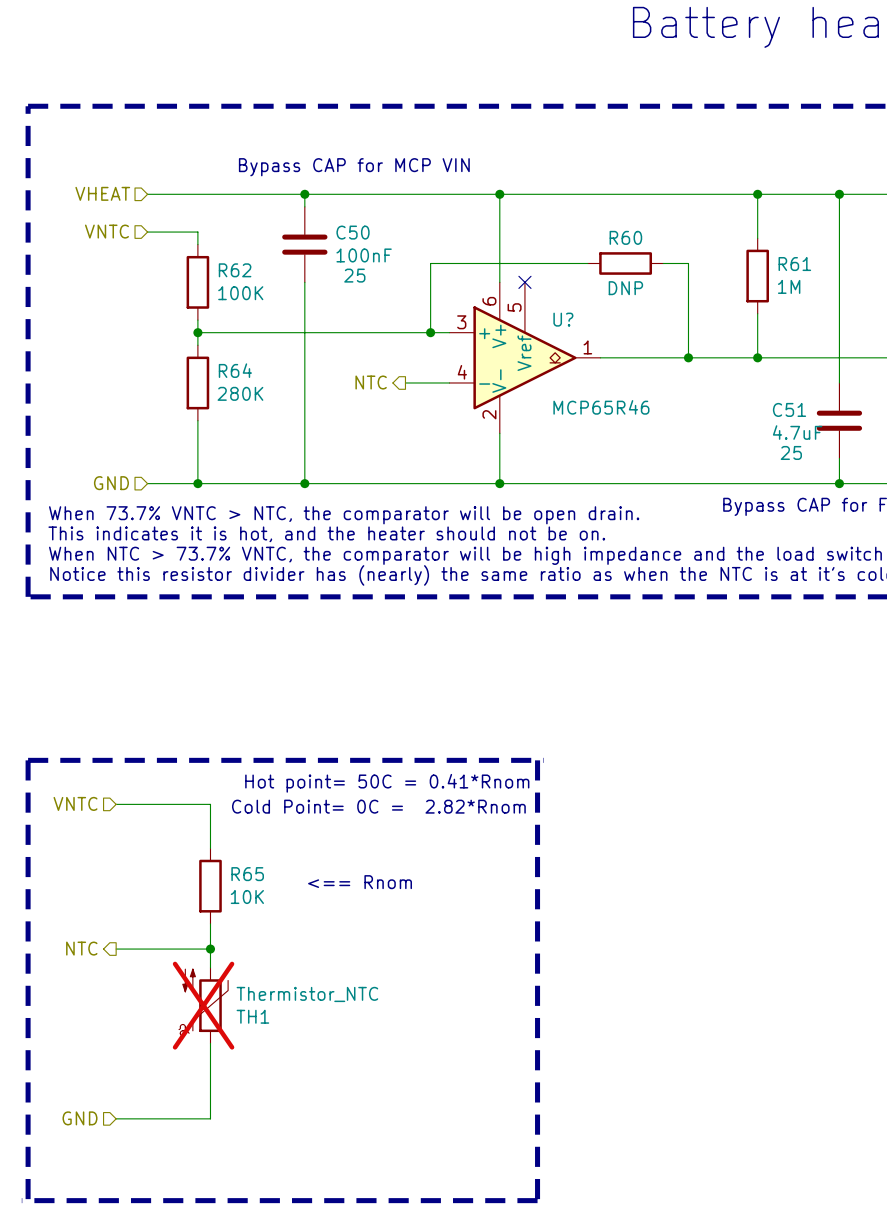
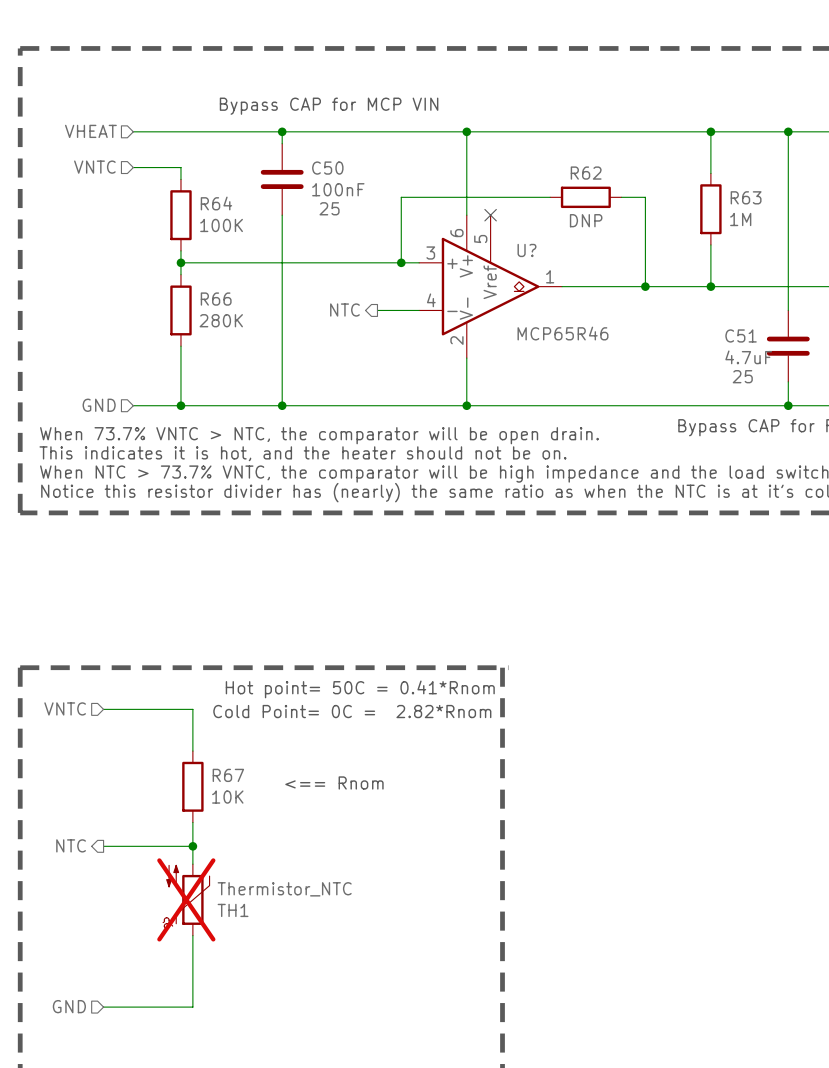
R60 name: R60 (625, 237) -> R62 (586, 173)
R61 name: R61 (794, 264) -> R63 (746, 197)
R62 name: R62 (235, 270) -> R64 (216, 203)
R64 name: R64 (235, 370) -> R66 (216, 299)
R65 name: R65 (247, 874) -> R67 (228, 775)

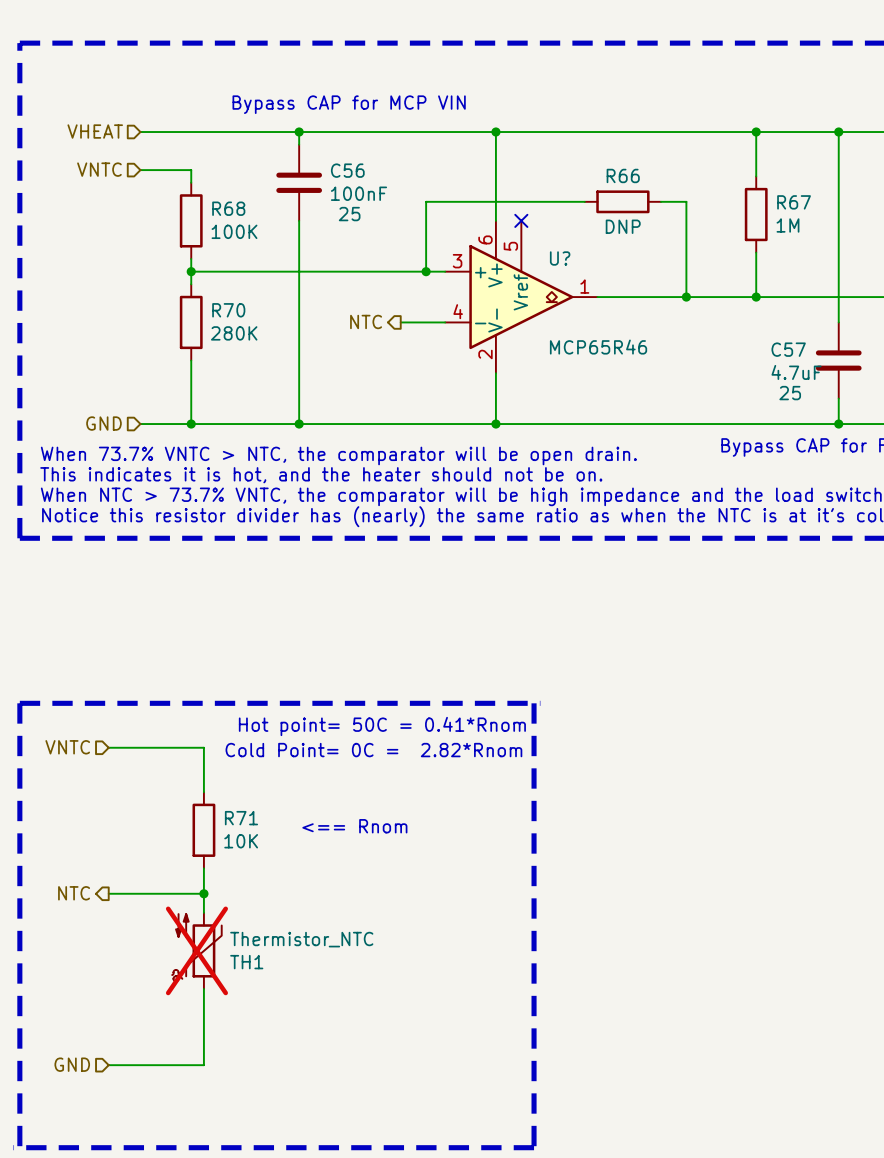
C50 name: C50 (327, 168) -> C56 (347, 170)
R62 name: R62 (586, 173) -> R66 (623, 175)
R63 name: R63 (746, 197) -> R67 (794, 202)
R64 name: R64 (216, 203) -> R68 (228, 208)
R66 name: R66 (216, 299) -> R70 (228, 310)
C51 name: C51 (741, 335) -> C57 (788, 349)
R67 name: R67 (228, 775) -> R71 (241, 818)

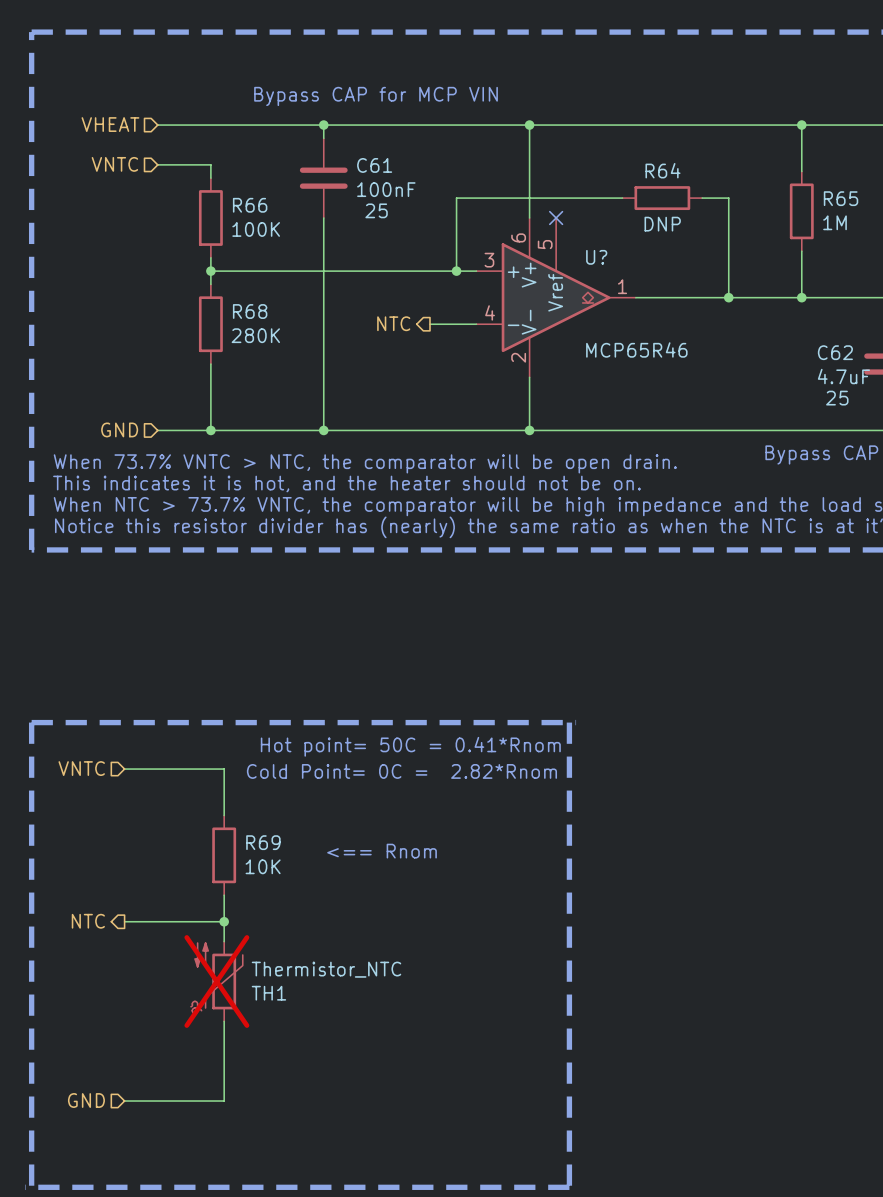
C56 name: C56 (347, 170) -> C61 (374, 165)
R66 name: R66 (623, 175) -> R64 (662, 170)
R67 name: R67 (794, 202) -> R65 (841, 198)
R68 name: R68 (228, 208) -> R66 (250, 205)
R70 name: R70 (228, 310) -> R68 (250, 311)
C57 name: C57 (788, 349) -> C62 (835, 352)
R71 name: R71 (241, 818) -> R69 (263, 842)

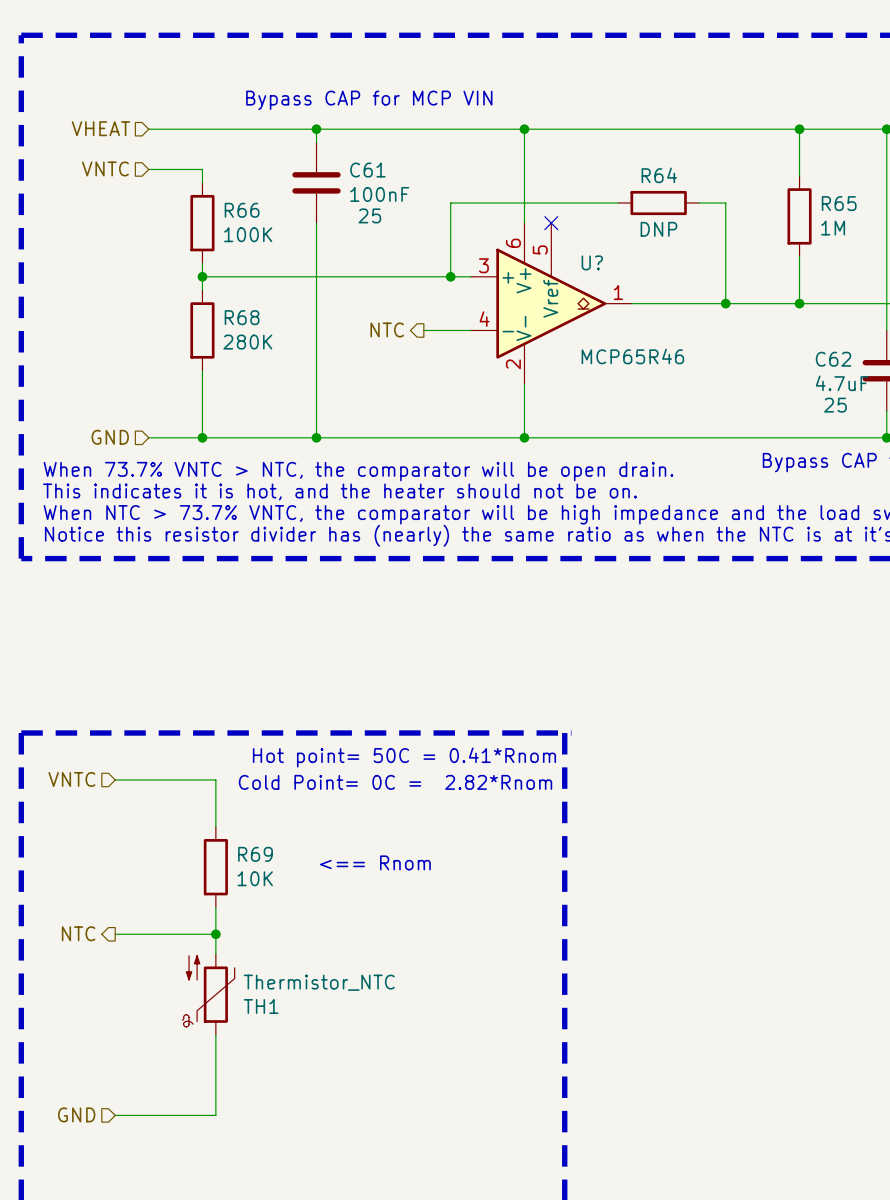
TH1 do-not-place cross: (216, 981) -> none

